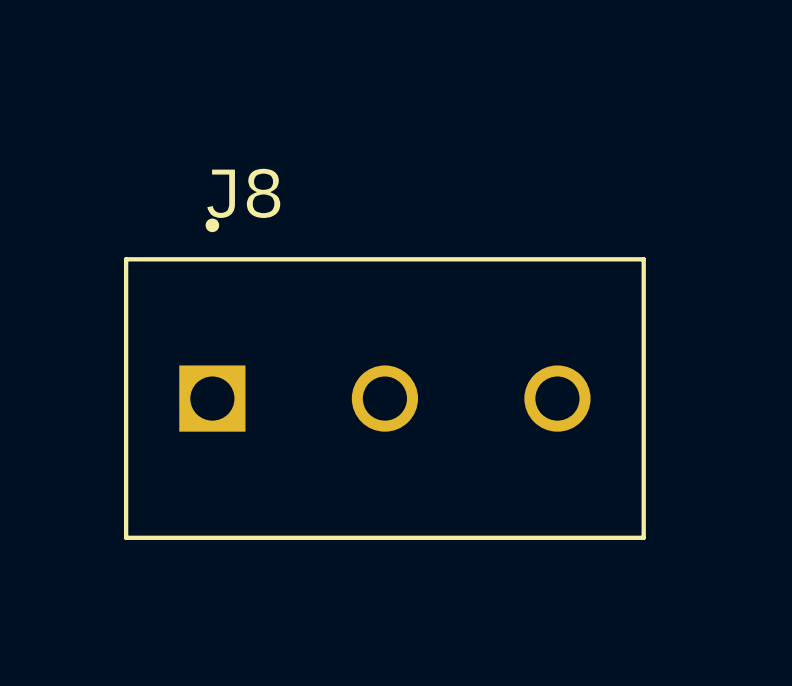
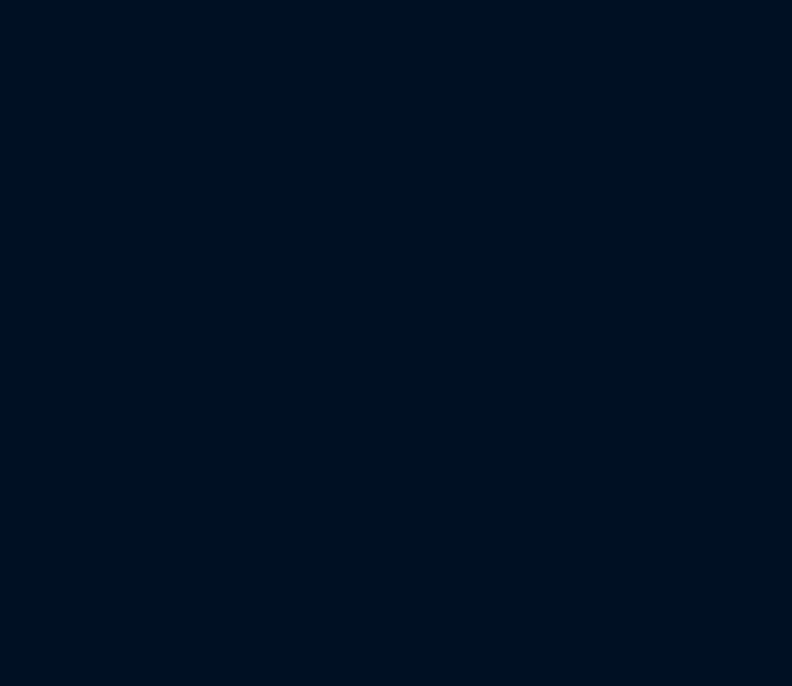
J8: (384, 379) -> none

